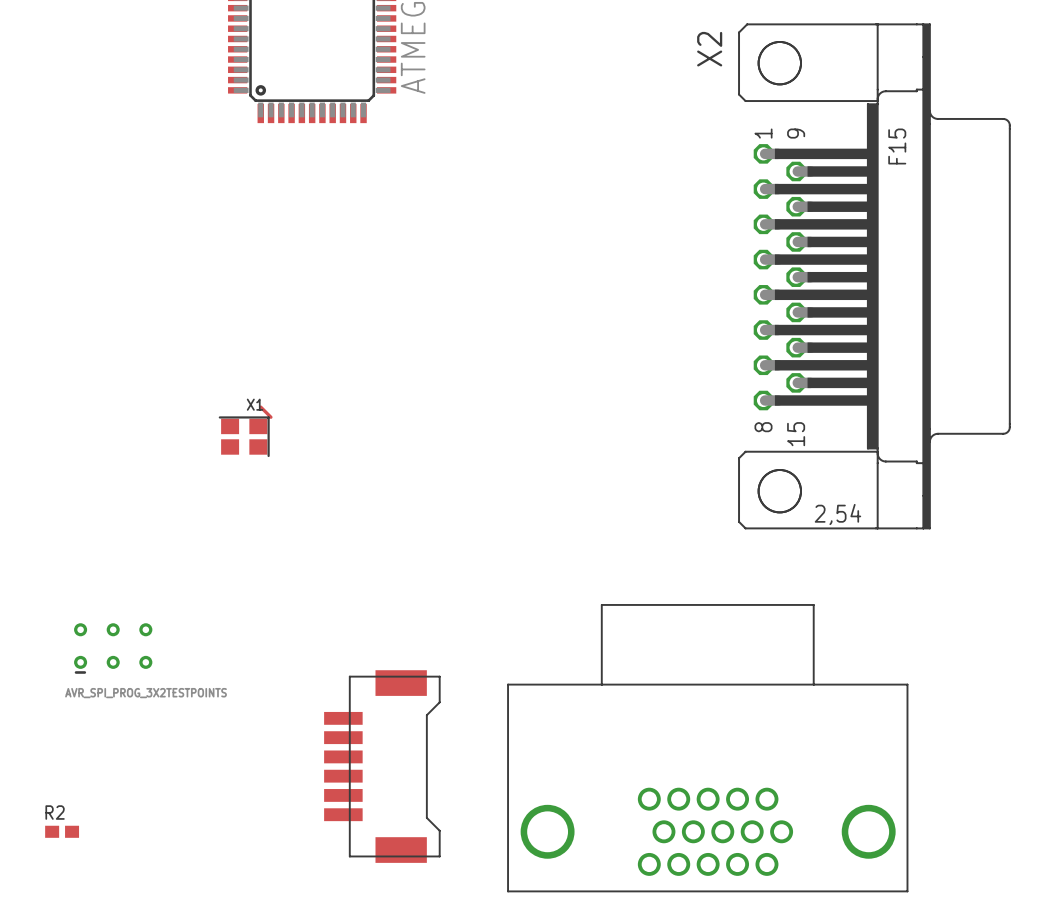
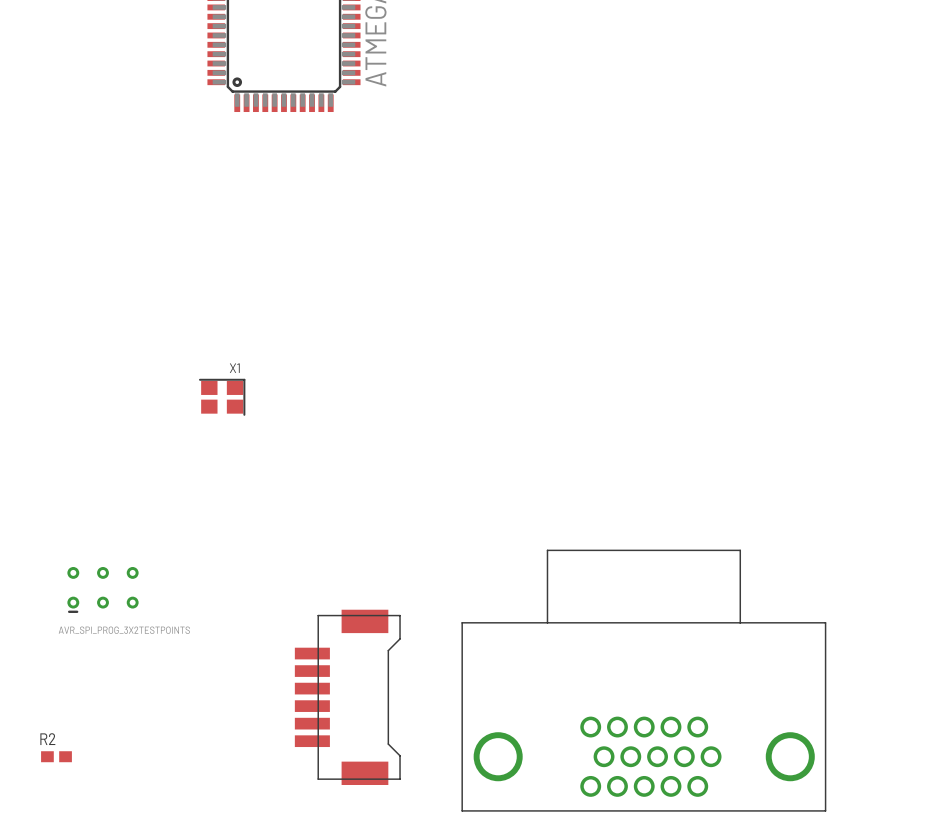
X2: (874, 276) -> none
track: (260, 407) (270, 417) -> none

